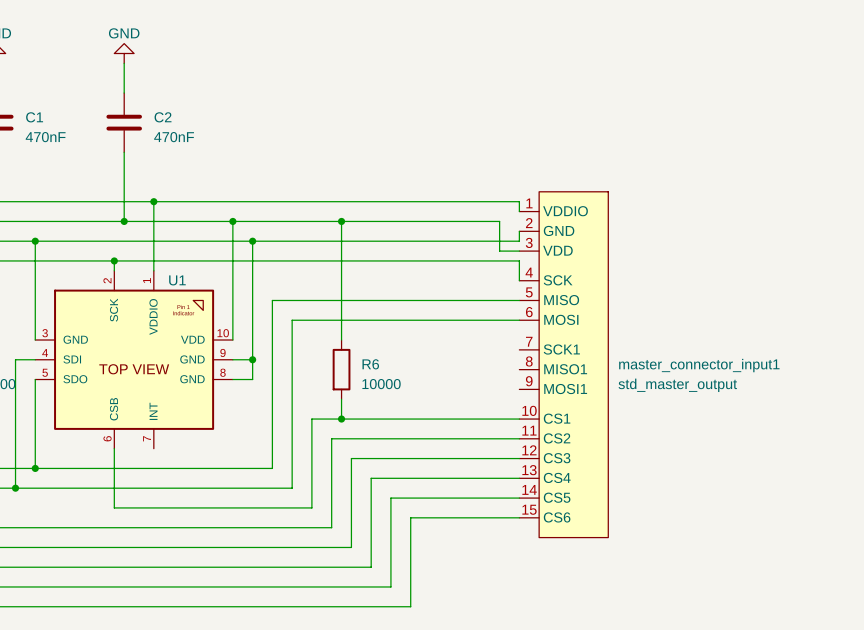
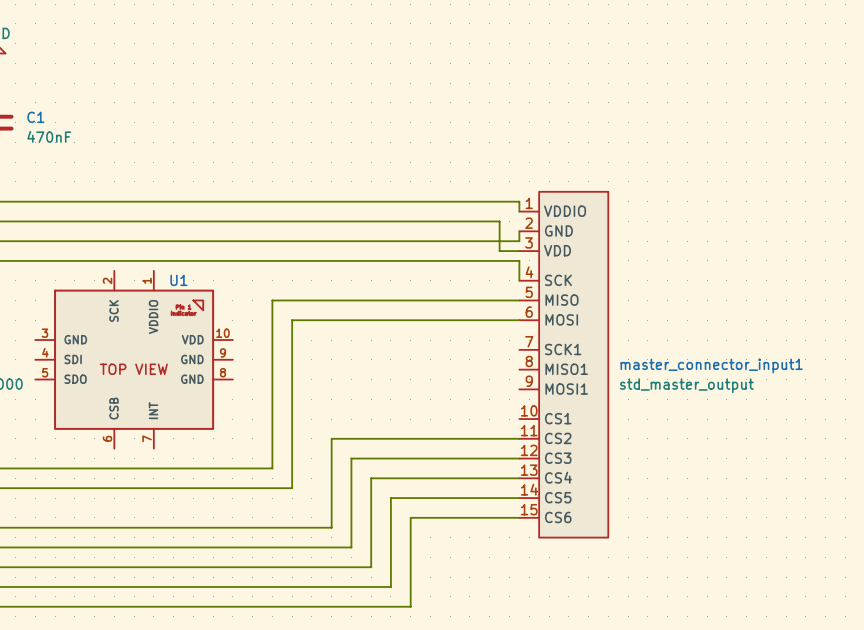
power symbol: GND (124, 53) -> none
wire: (124, 63) (124, 93) -> none
C2: 470nF (124, 122) -> none
wire: (124, 152) (124, 221) -> none
wire: (153, 201) (153, 270) -> none
junction: (153, 201) -> none
junction: (124, 221) -> none
wire: (232, 221) (232, 340) -> none
junction: (232, 221) -> none
wire: (341, 221) (341, 340) -> none
junction: (341, 221) -> none
wire: (35, 241) (35, 340) -> none
junction: (35, 241) -> none
wire: (252, 241) (252, 379) (232, 379) -> none
junction: (252, 241) -> none
wire: (114, 260) (114, 270) -> none
junction: (114, 260) -> none
wire: (35, 359) (15, 359) (15, 488) -> none
wire: (232, 359) (252, 359) -> none
junction: (252, 359) -> none
R6: 10000 (341, 369) -> none
wire: (35, 379) (35, 468) -> none
wire: (341, 399) (341, 419) -> none
junction: (341, 419) -> none
wire: (519, 419) (311, 419) (311, 507) (114, 507) (114, 448) -> none
junction: (35, 468) -> none
junction: (15, 488) -> none

